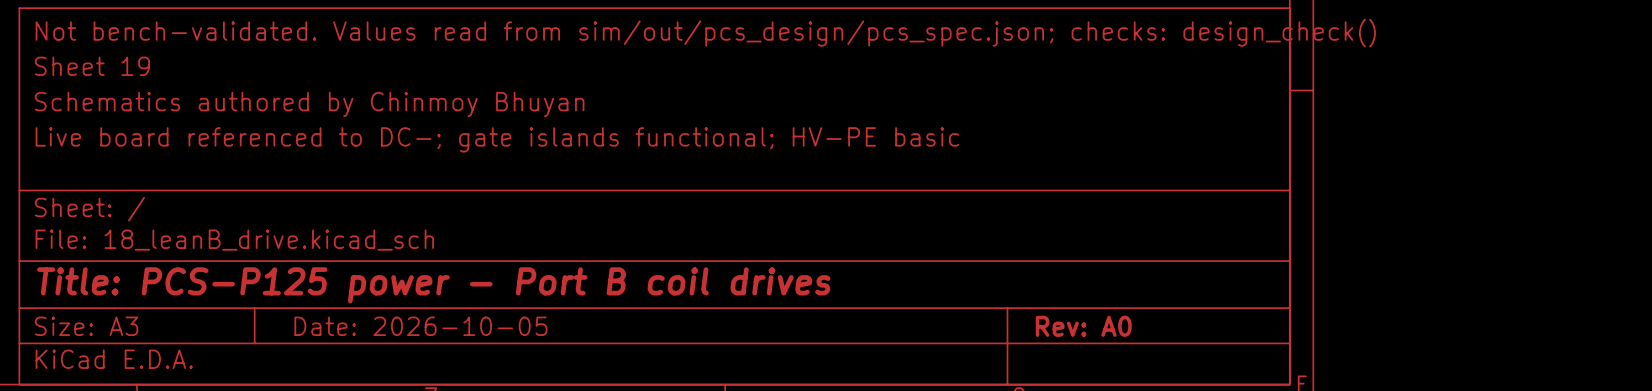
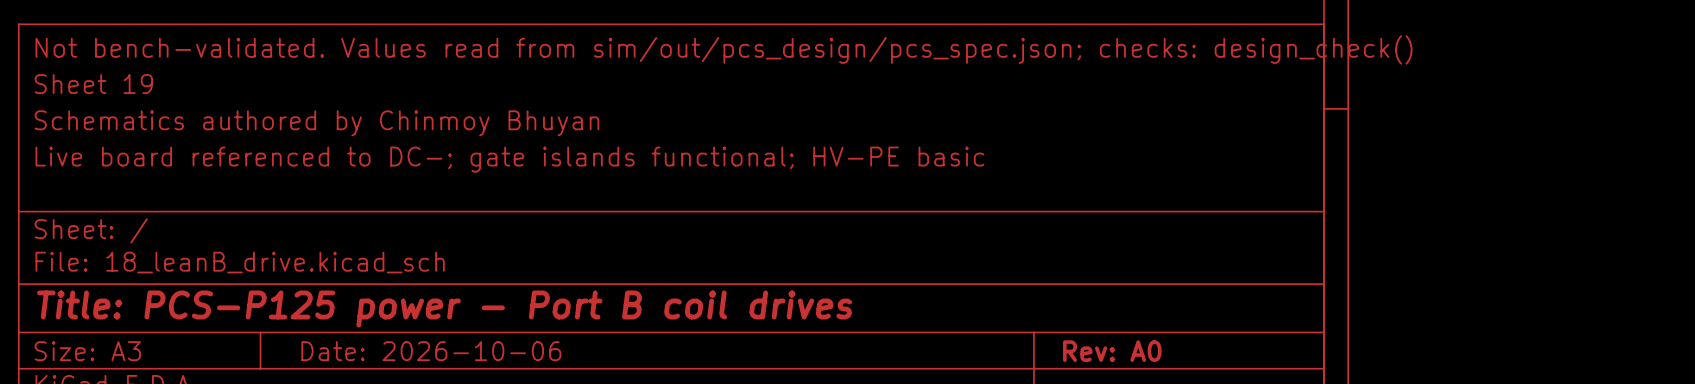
title block: Date: 2026-10-05 (420, 326) -> Date: 2026-10-06 (431, 351)

